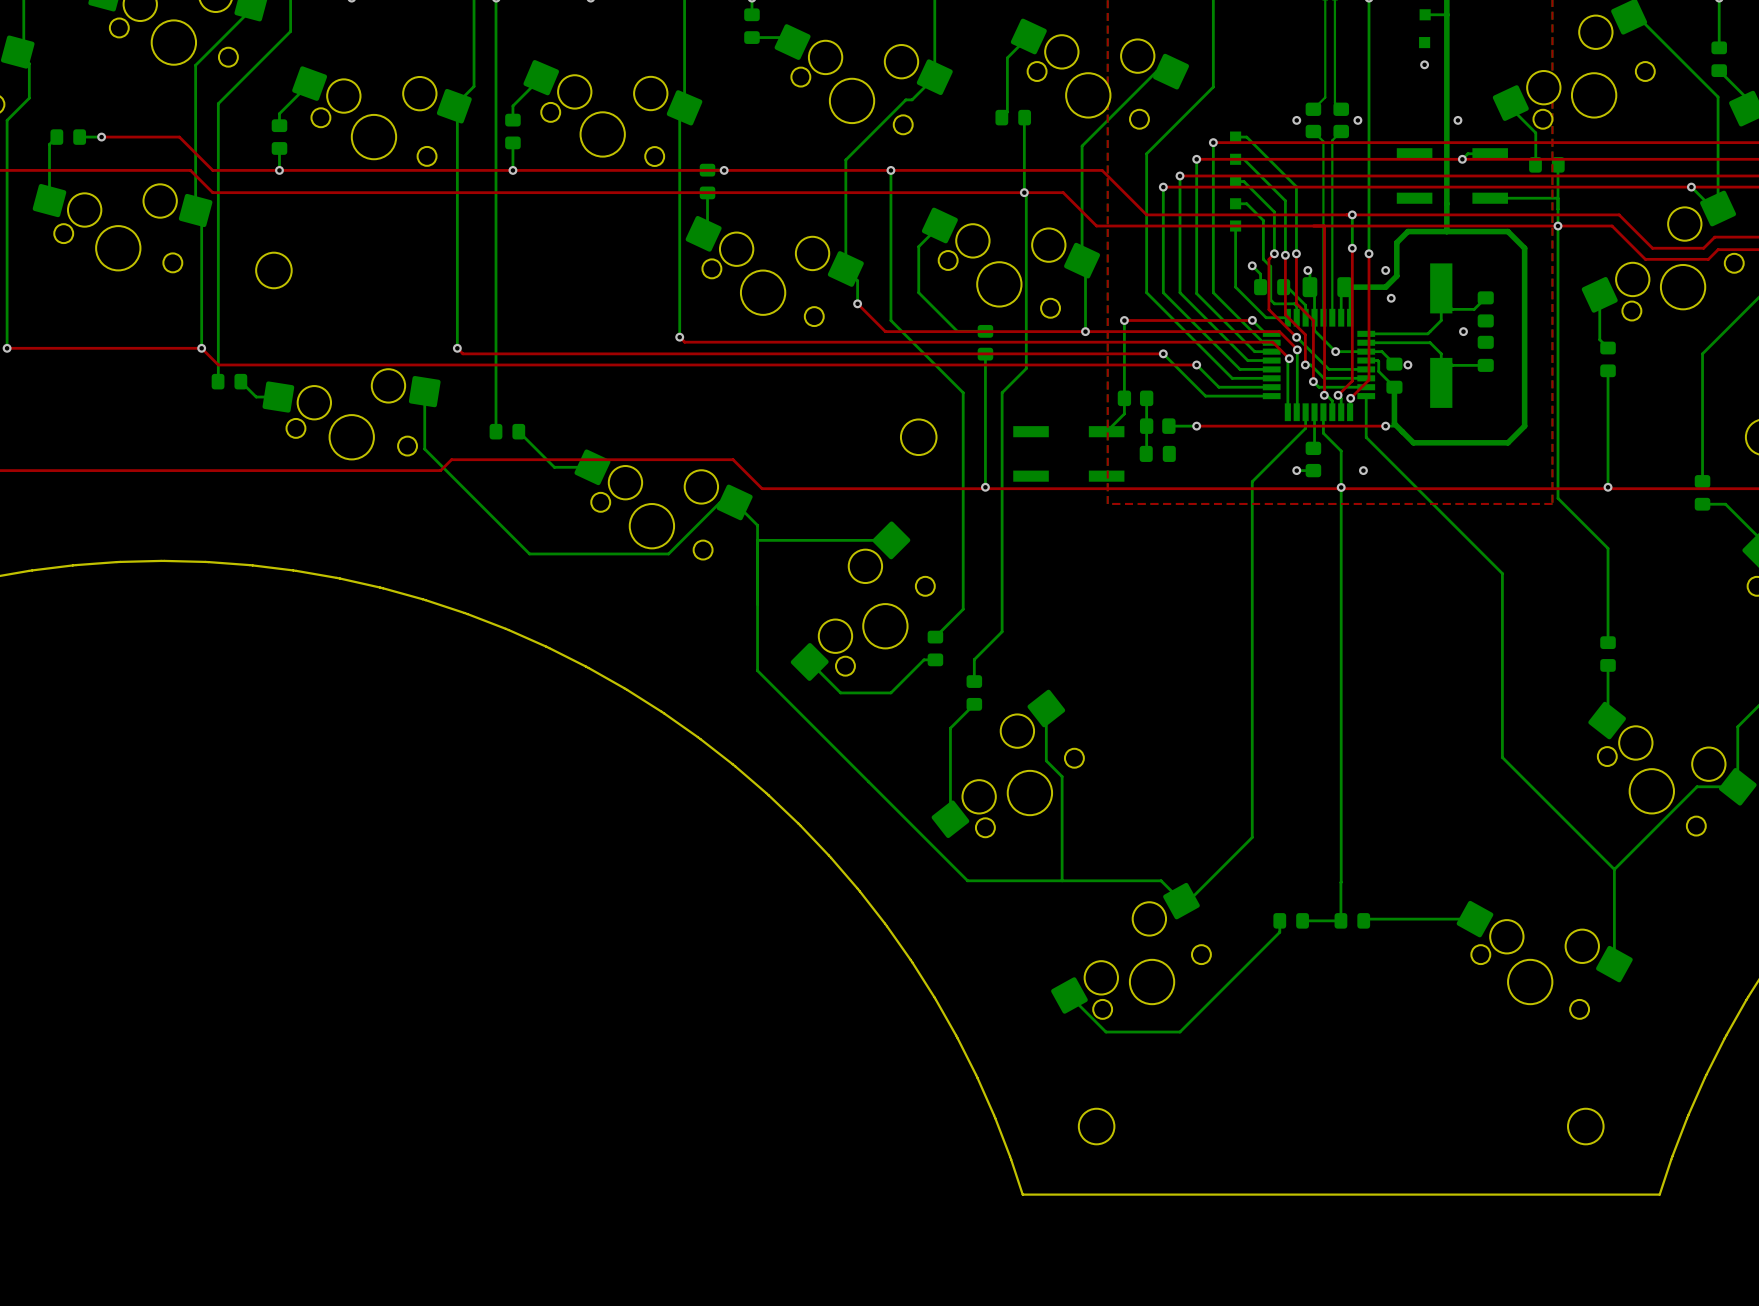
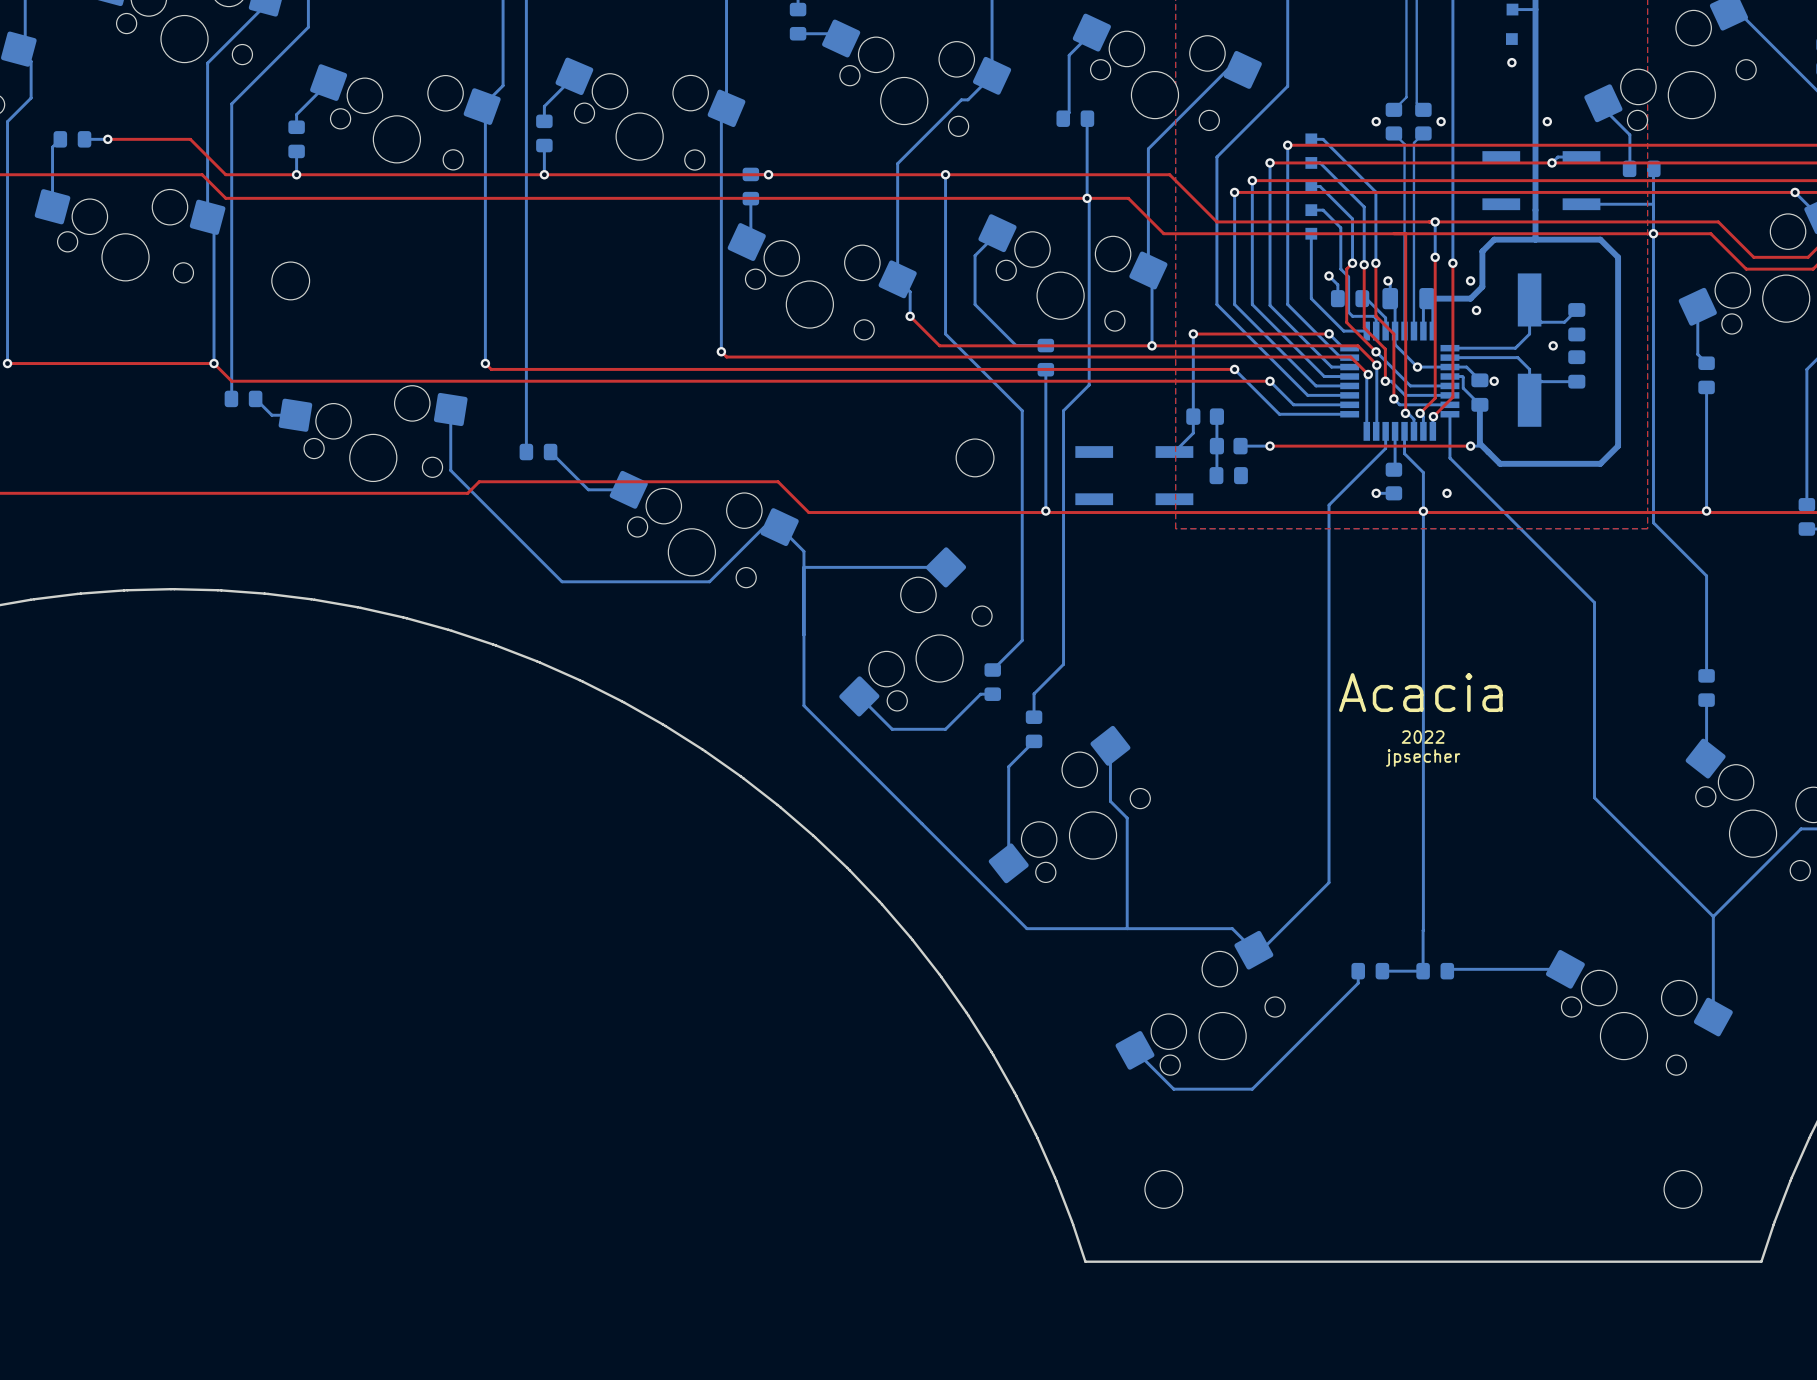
text: none -> Acacia (1420, 692)
text: none -> 2022 (1423, 737)
text: none -> jpsecher (1423, 758)

